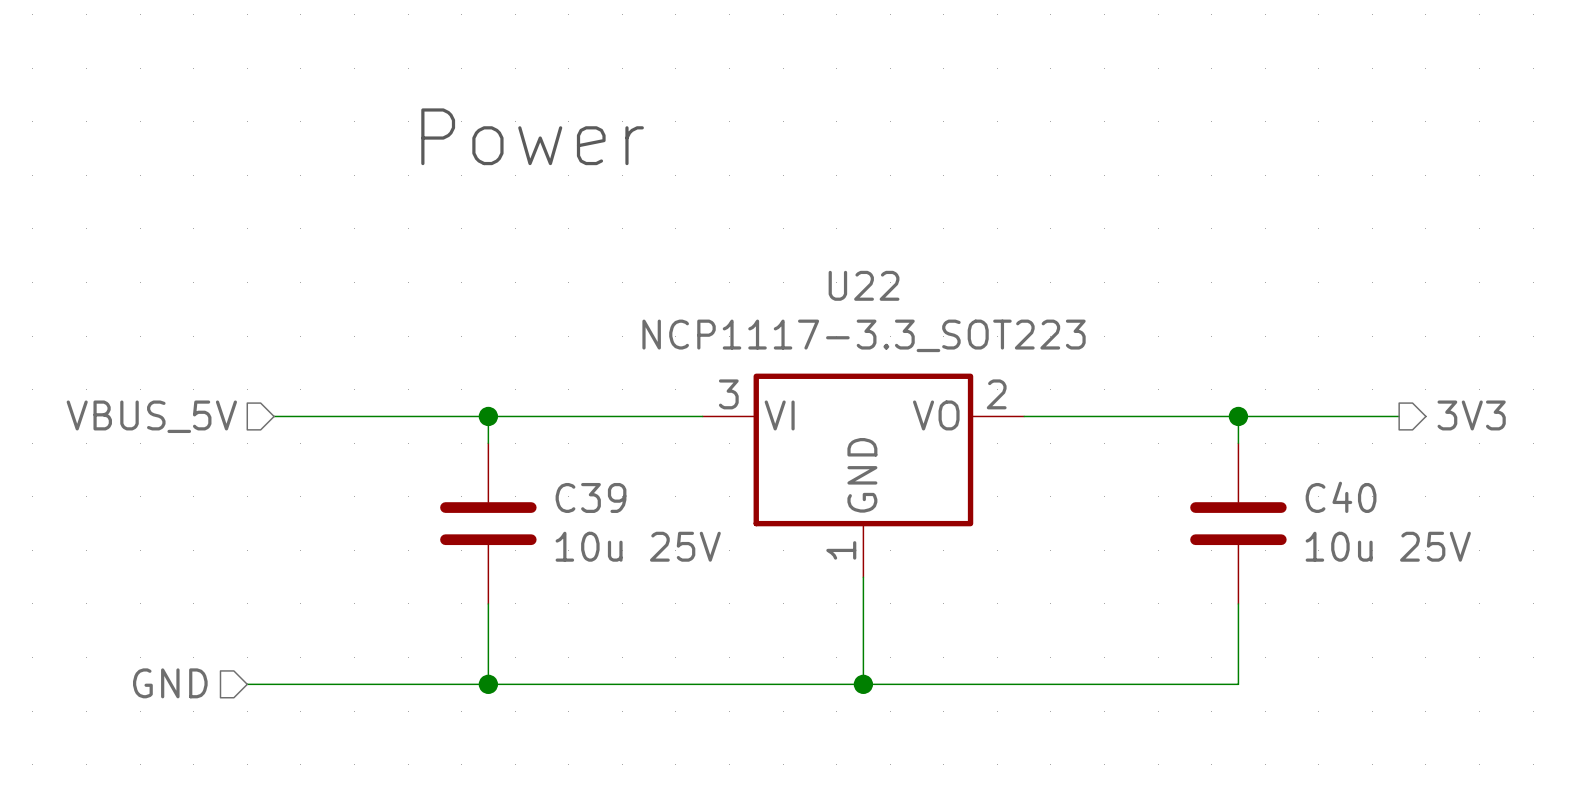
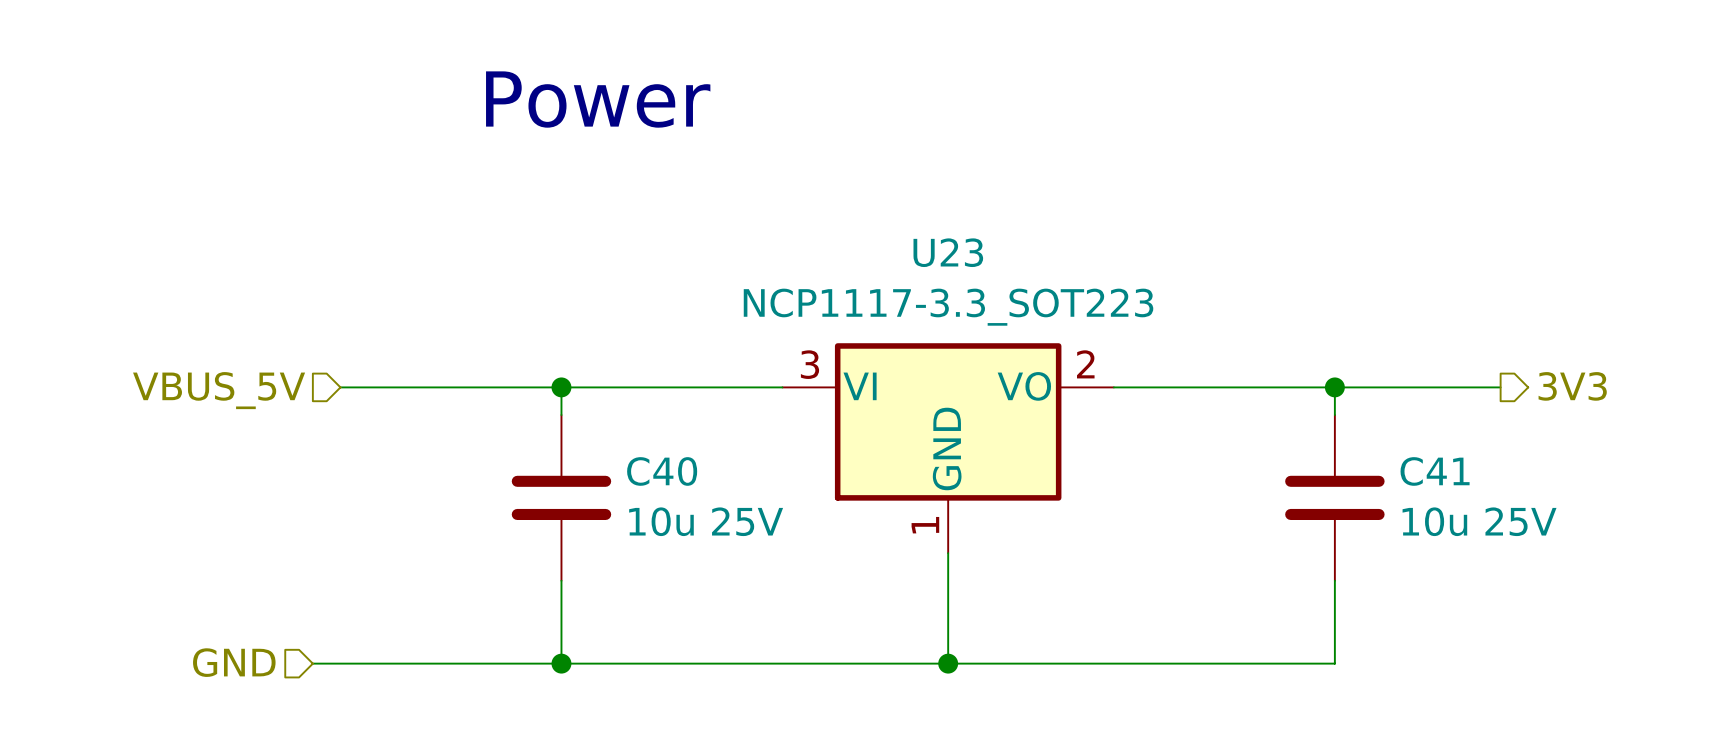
U22 name: U22 (864, 285) -> U23 (948, 252)
C39 name: C39 (591, 497) -> C40 (662, 471)
C40 name: C40 (1341, 497) -> C41 (1435, 471)

